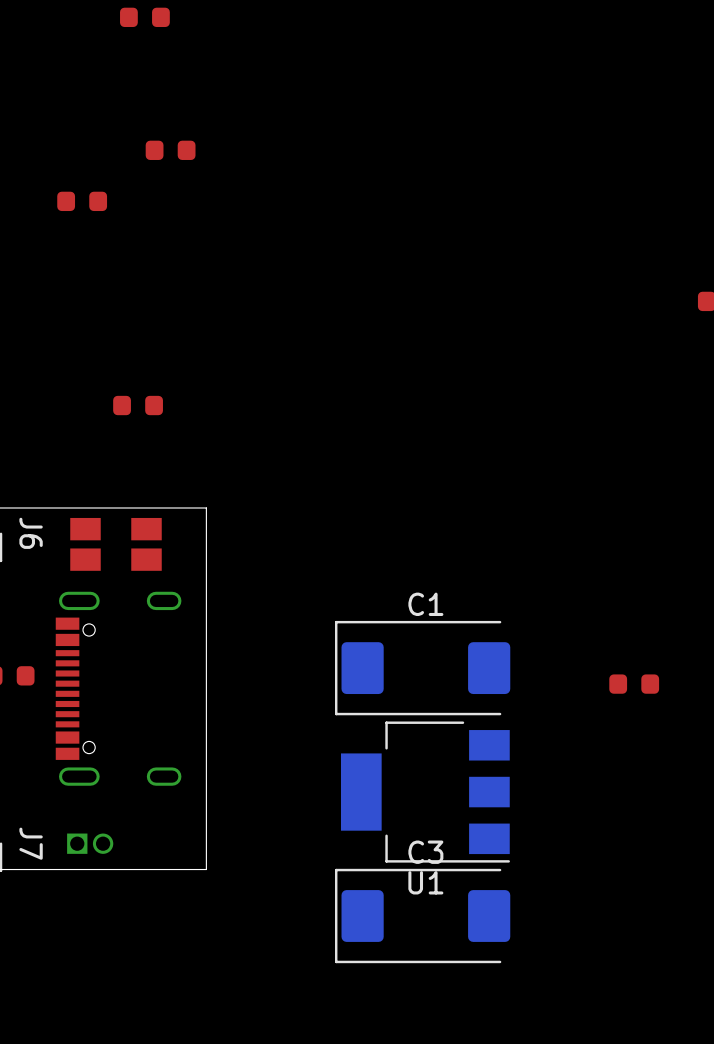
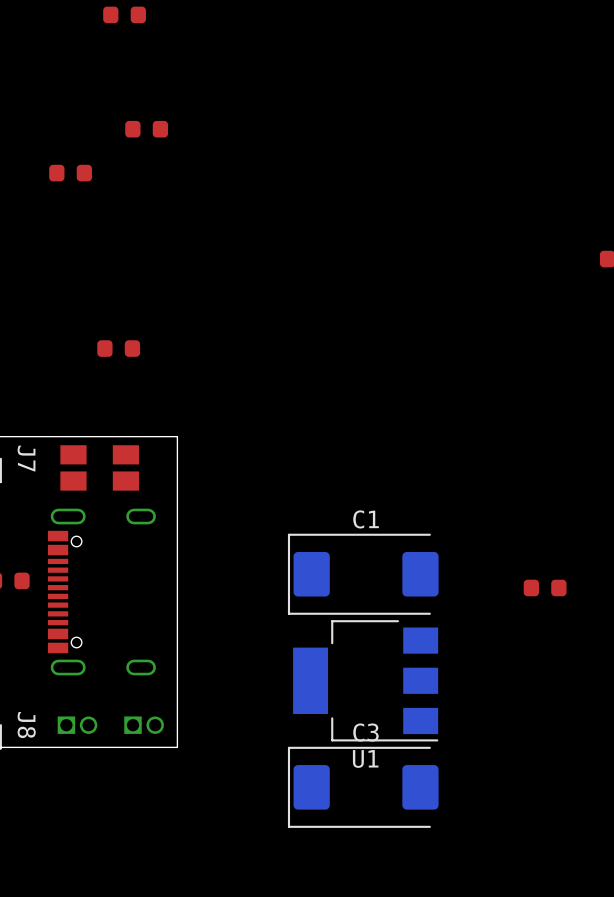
J6 name: J6 (31, 533) -> J7 (26, 458)
J7 name: J7 (31, 843) -> J8 (26, 725)
part: none -> (144, 725)

